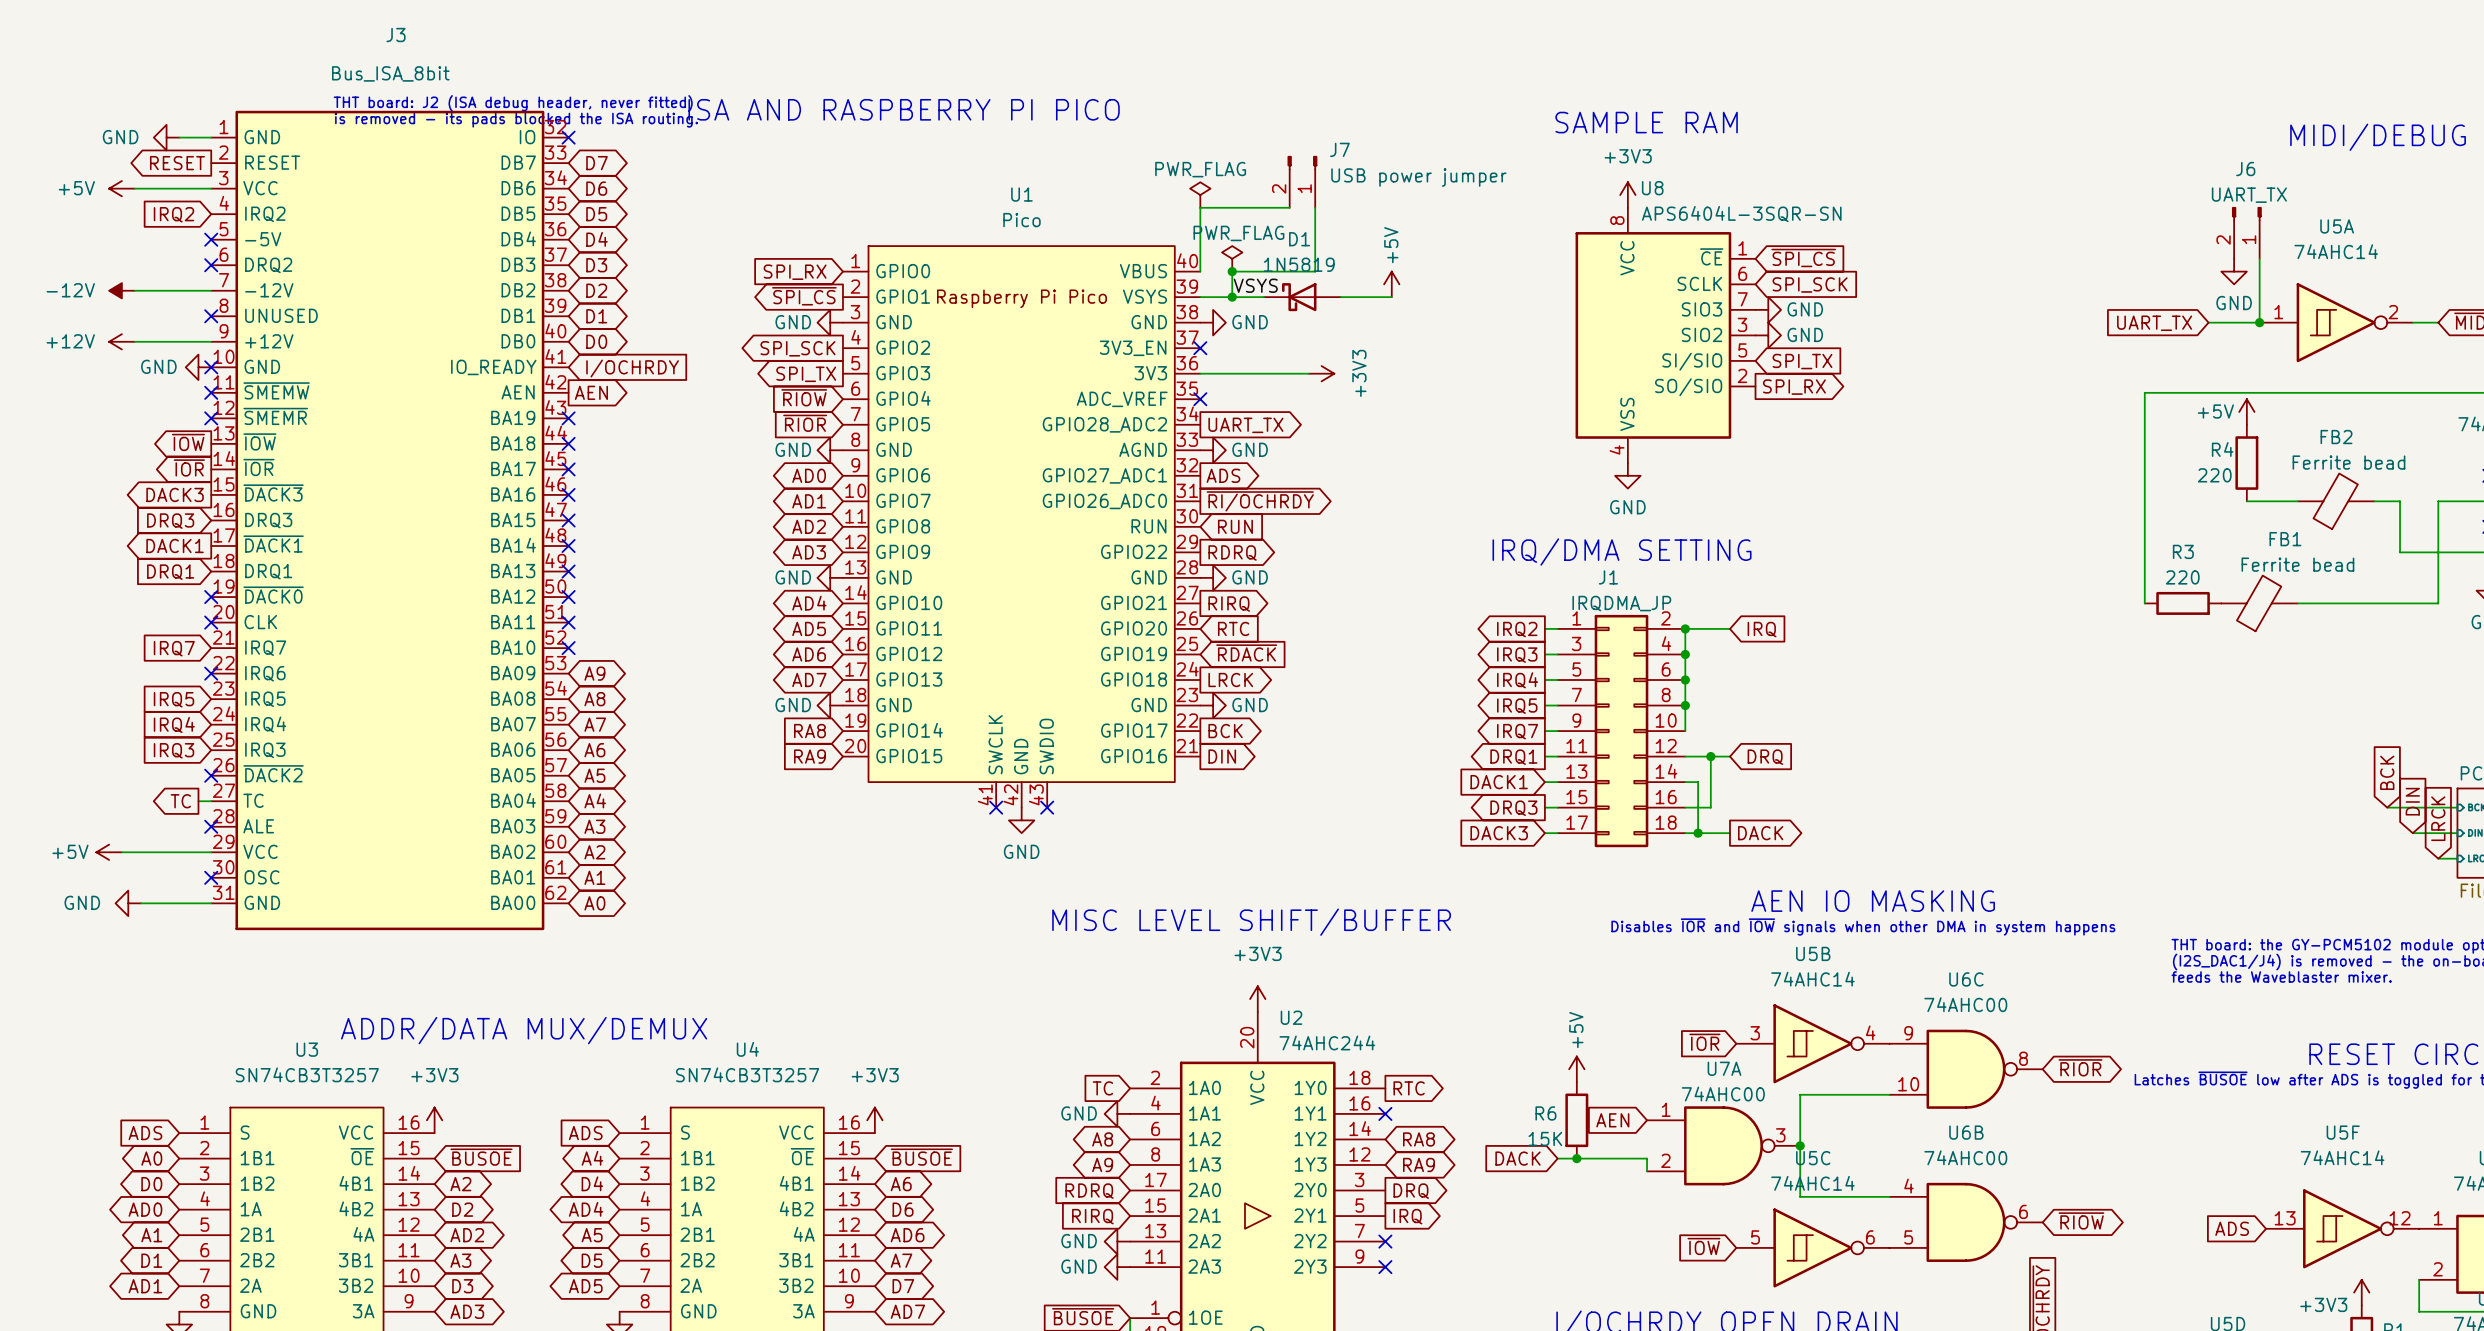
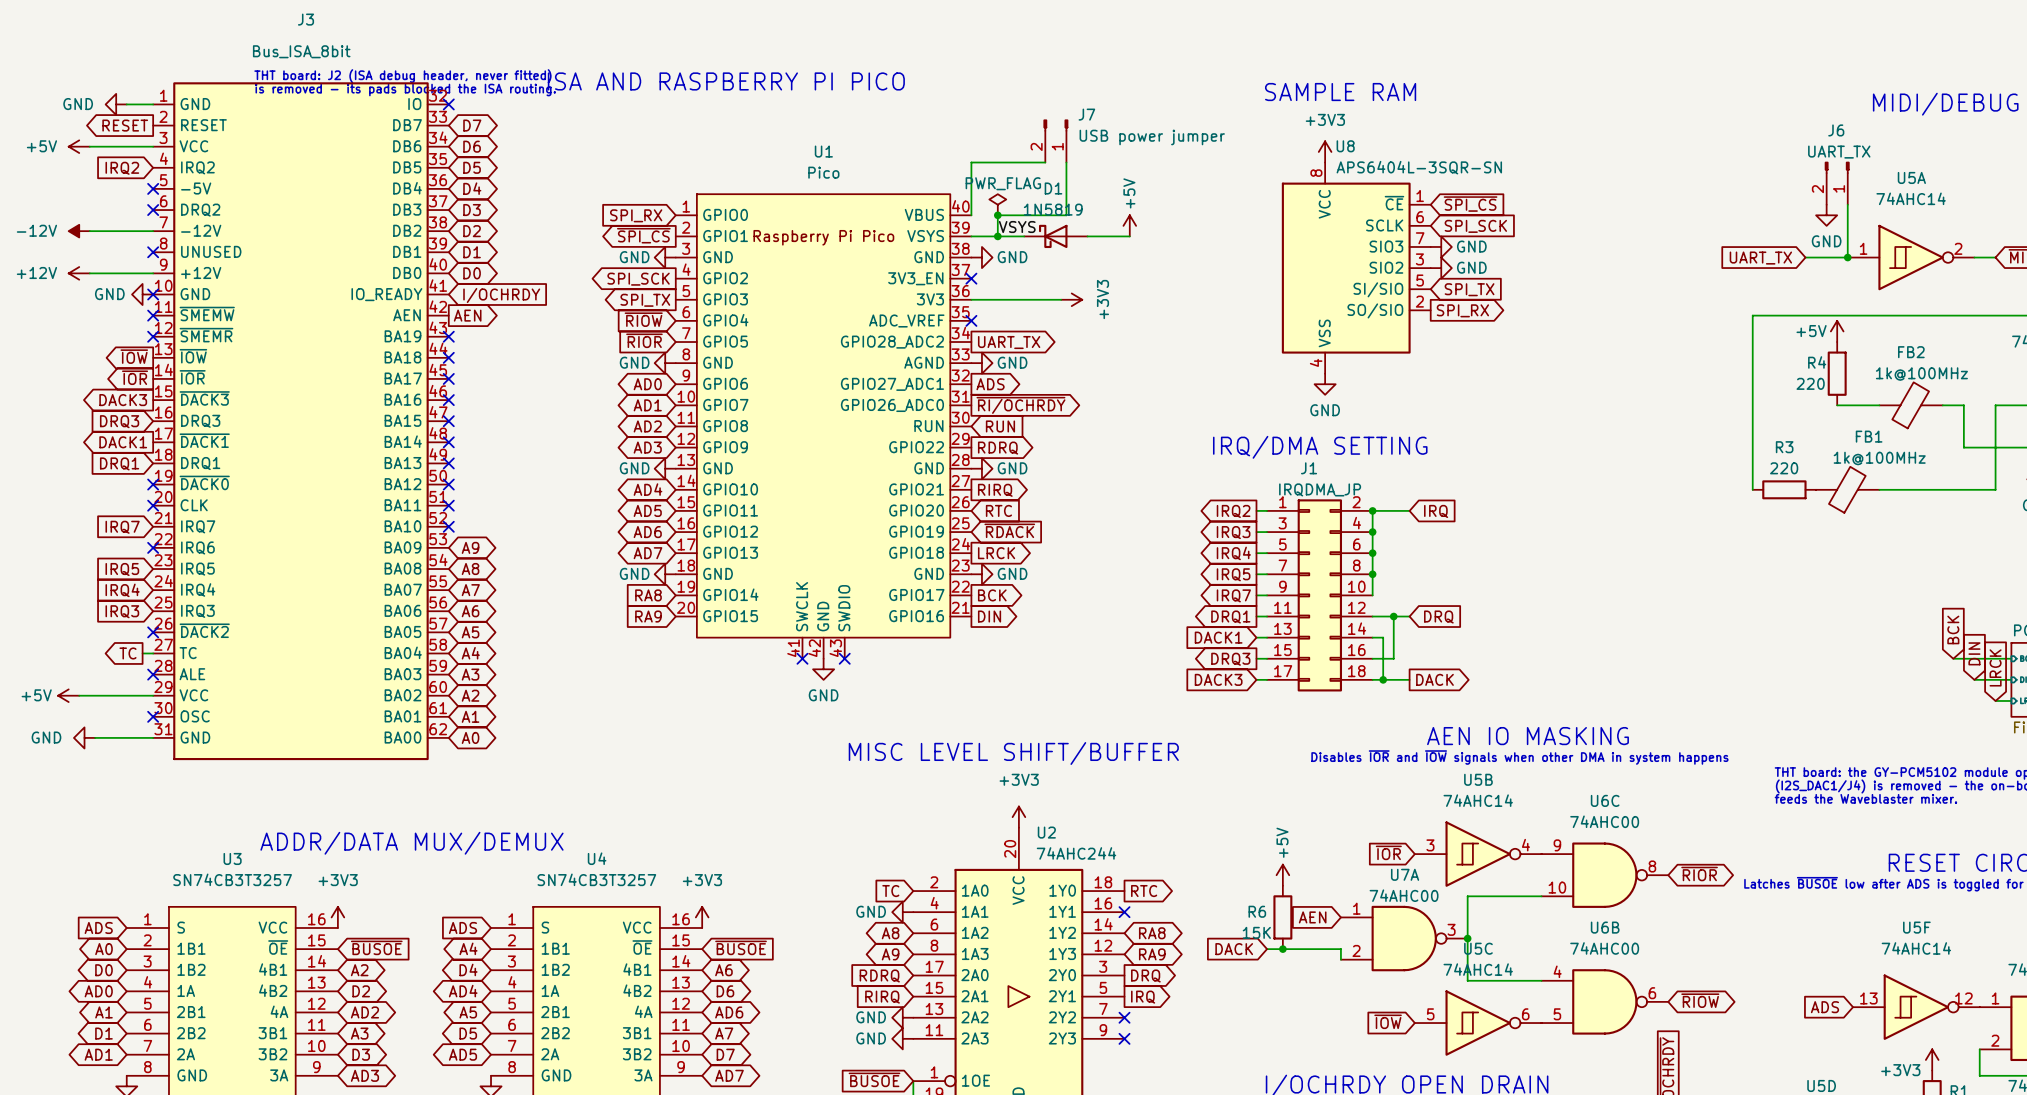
power symbol: PWR_FLAG (1200, 195) -> none
FB2 value: Ferrite bead (2348, 462) -> 1k@100MHz (1921, 374)
FB1 value: Ferrite bead (2297, 564) -> 1k@100MHz (1879, 458)

